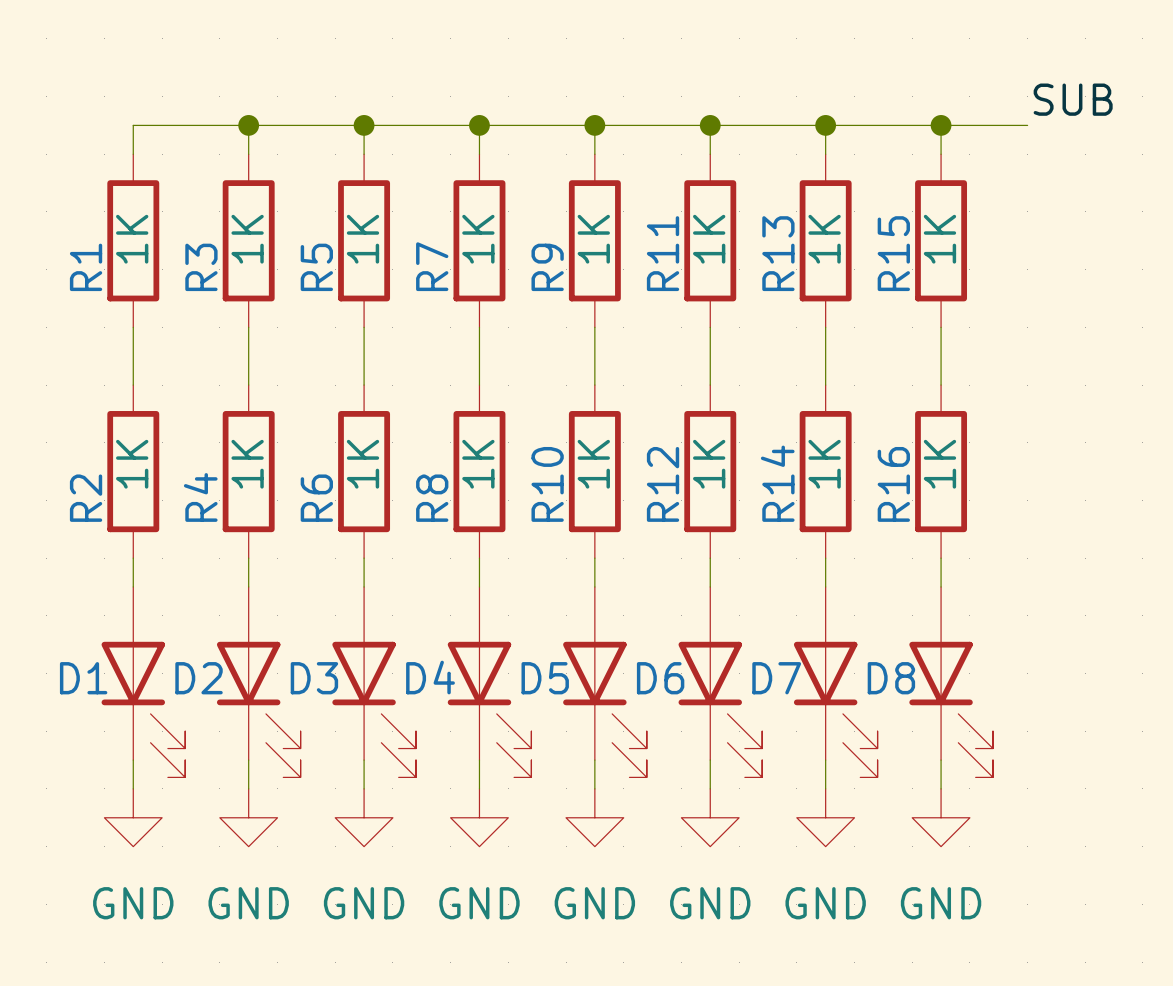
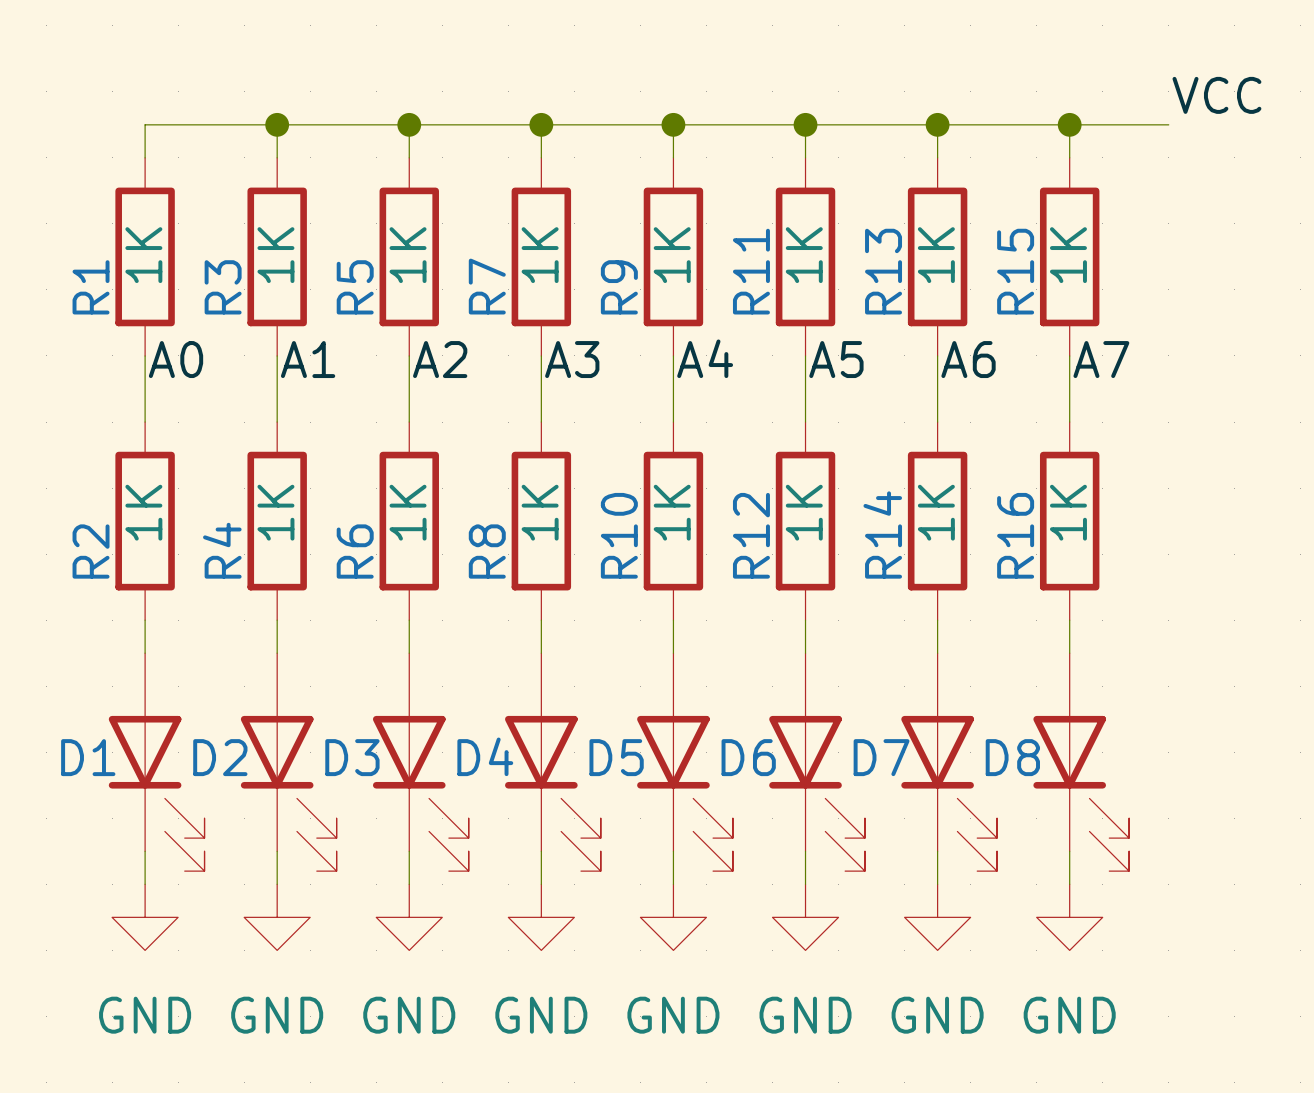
label: SUB (1073, 99) -> VCC (1216, 95)
label: none -> A4 (705, 358)
label: none -> A0 (176, 359)
label: none -> A1 (308, 359)
label: none -> A2 (440, 359)
label: none -> A3 (572, 359)
label: none -> A5 (836, 359)
label: none -> A6 (968, 359)
label: none -> A7 (1101, 359)

